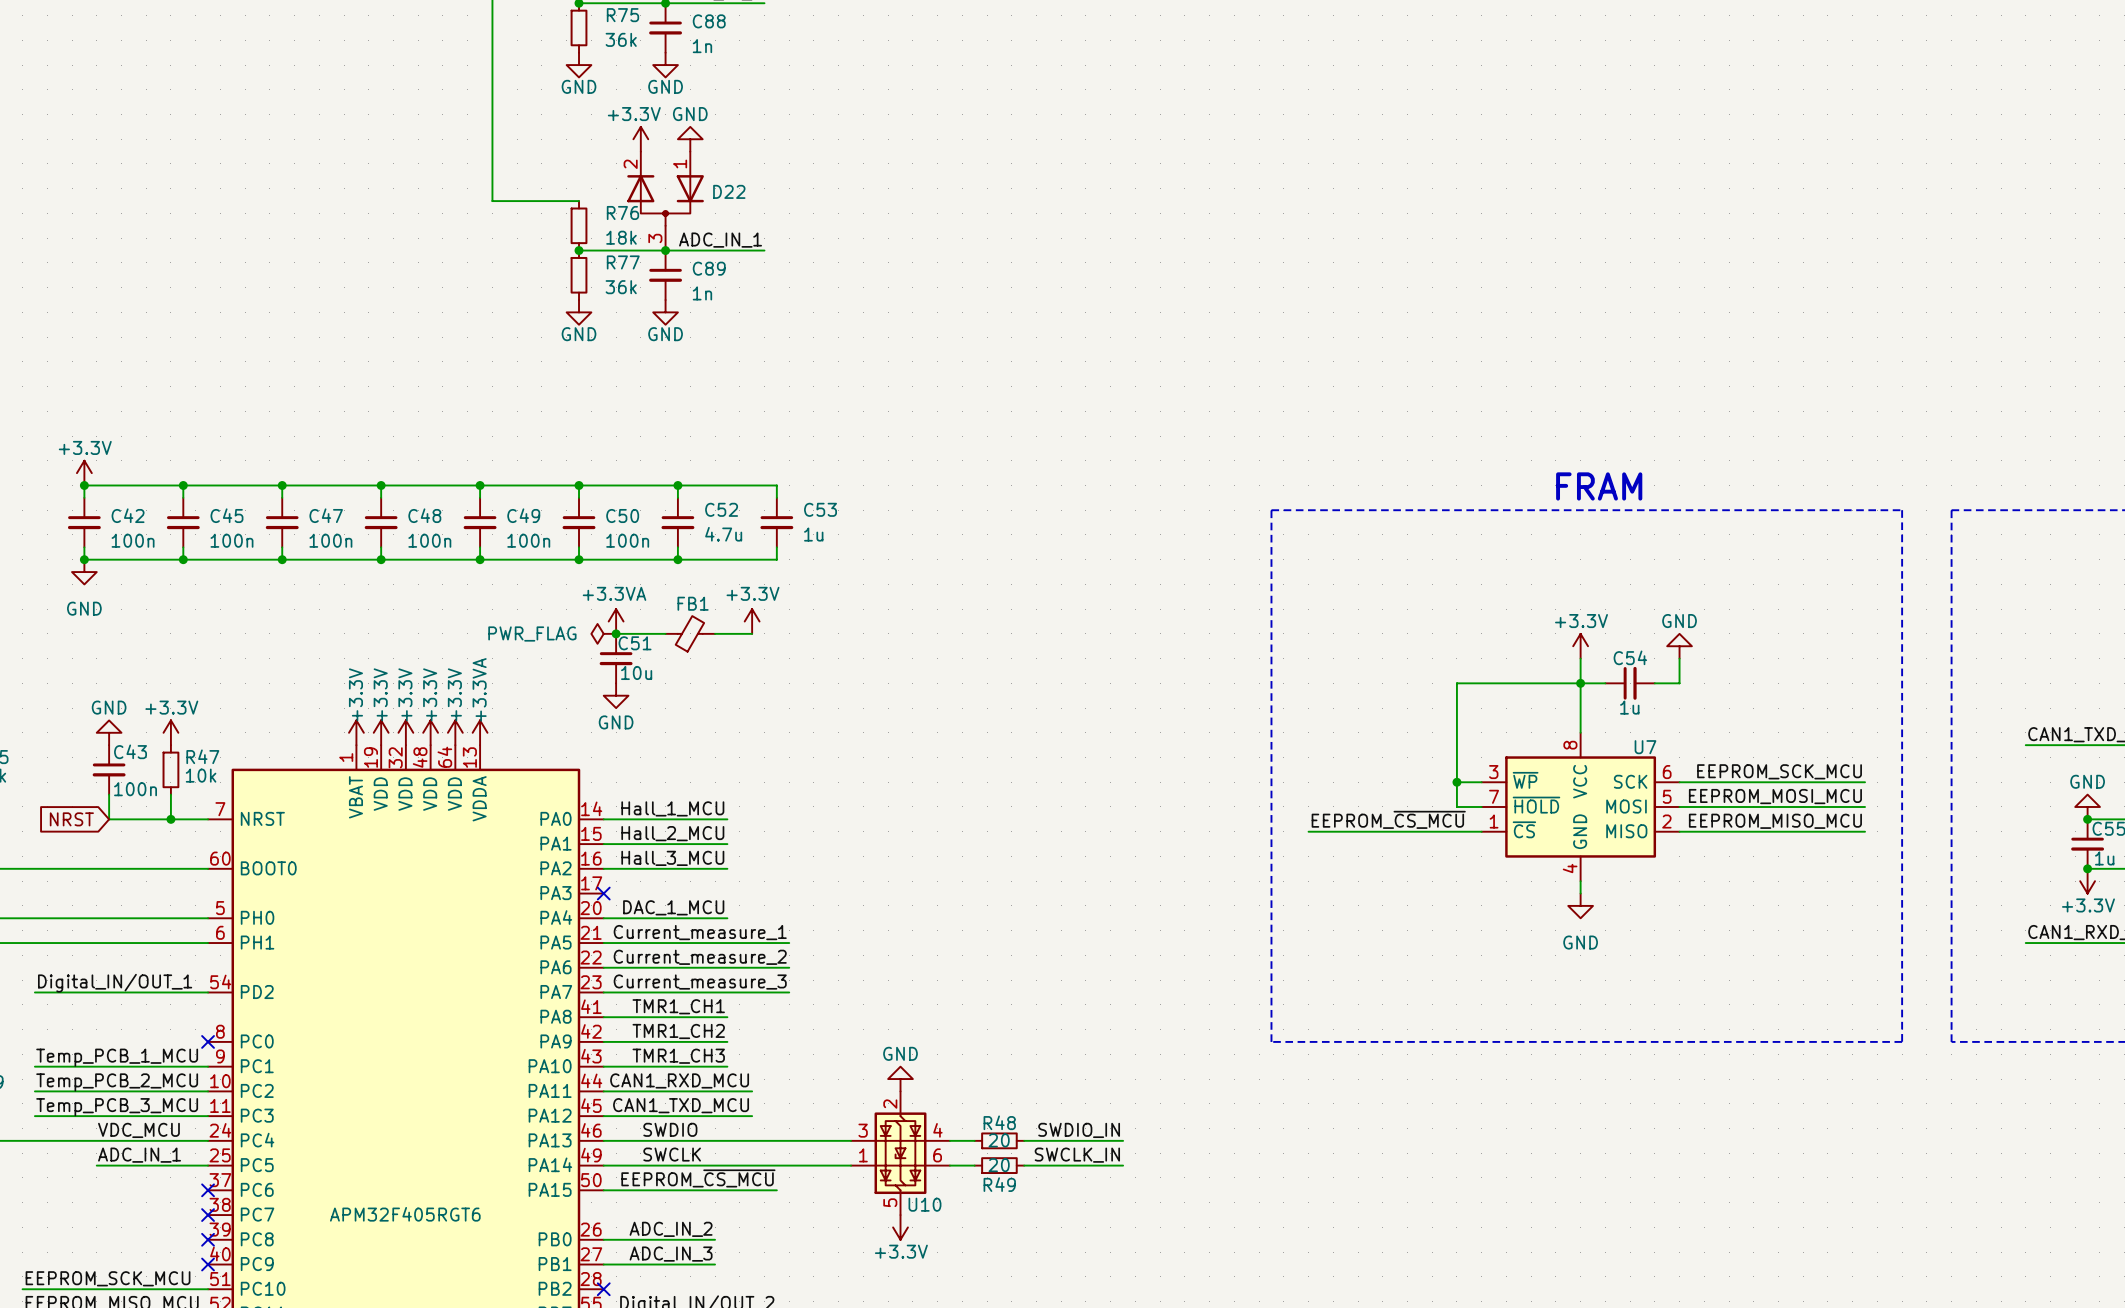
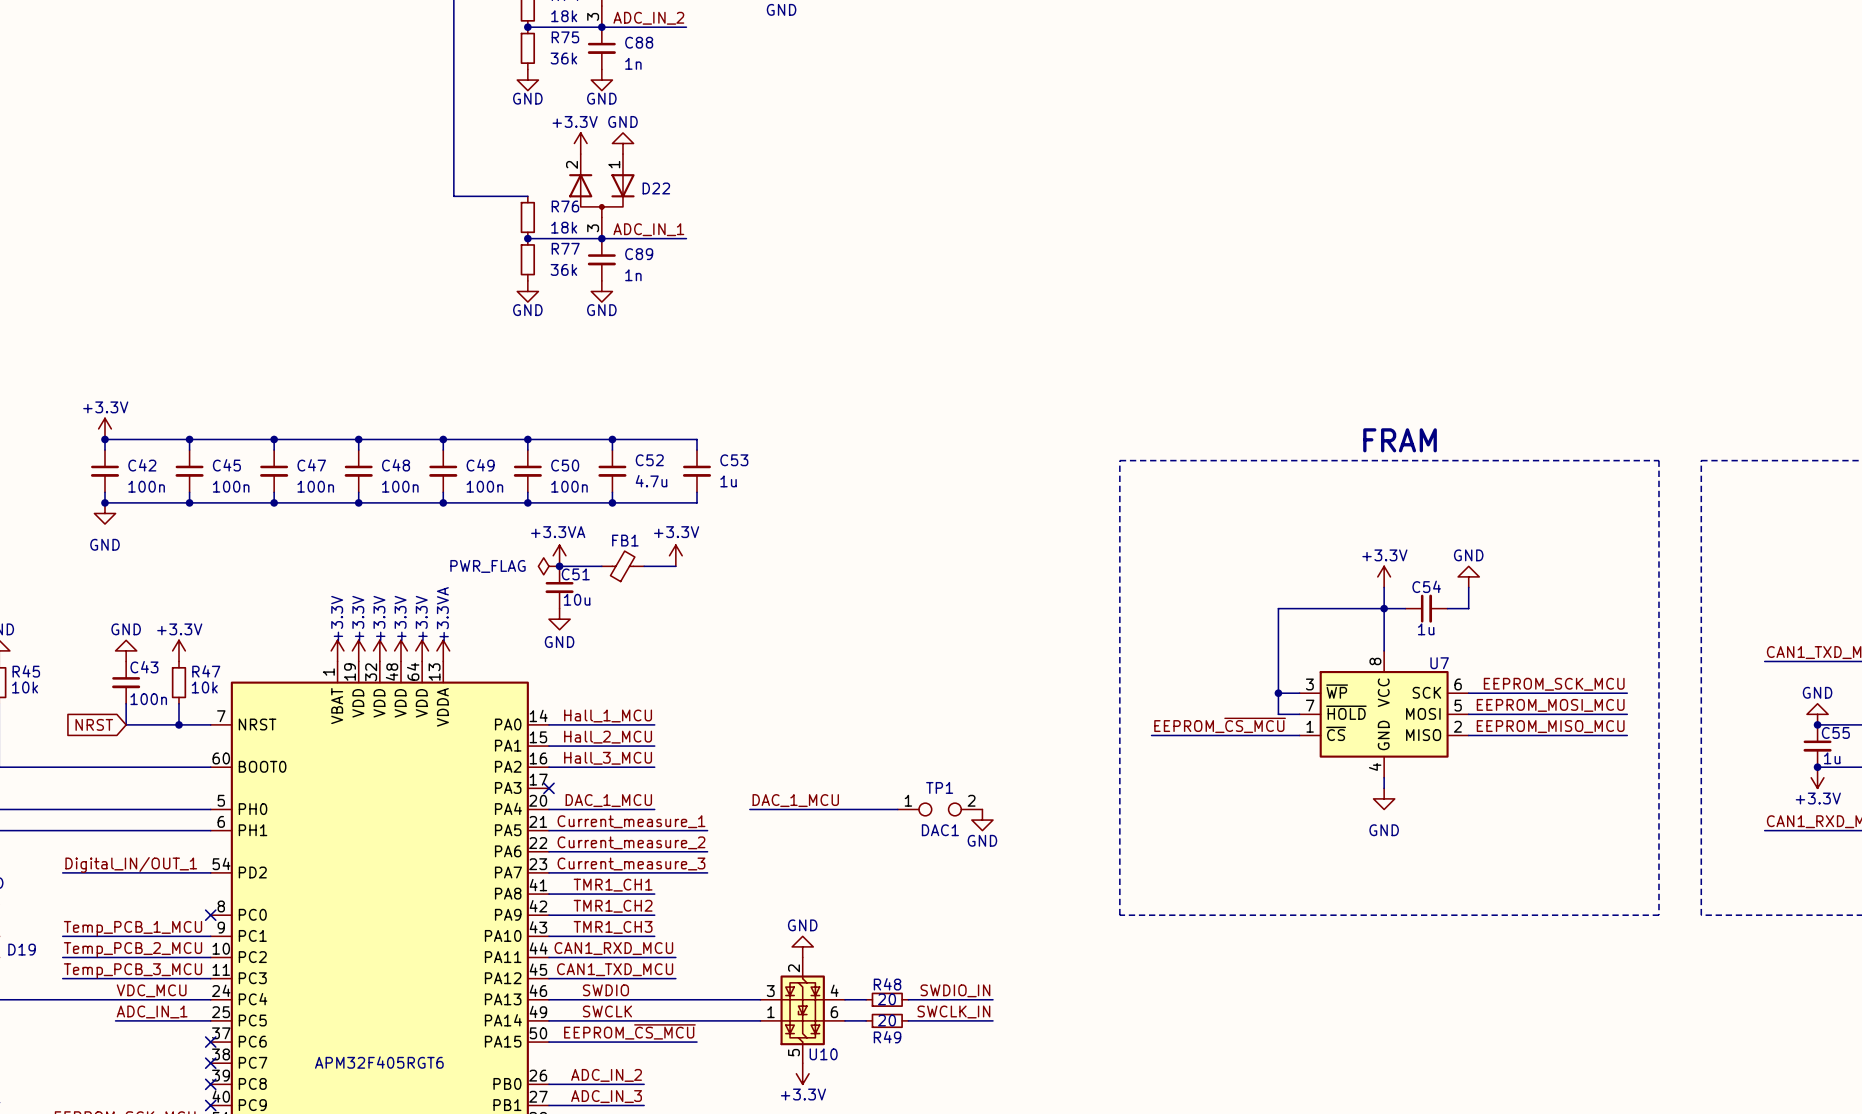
label: none -> DAC_1_MCU (795, 800)
wire: none -> (749, 809) (897, 809)
TP1: none -> DAC1 (940, 809)
power symbol: none -> GND (982, 820)

